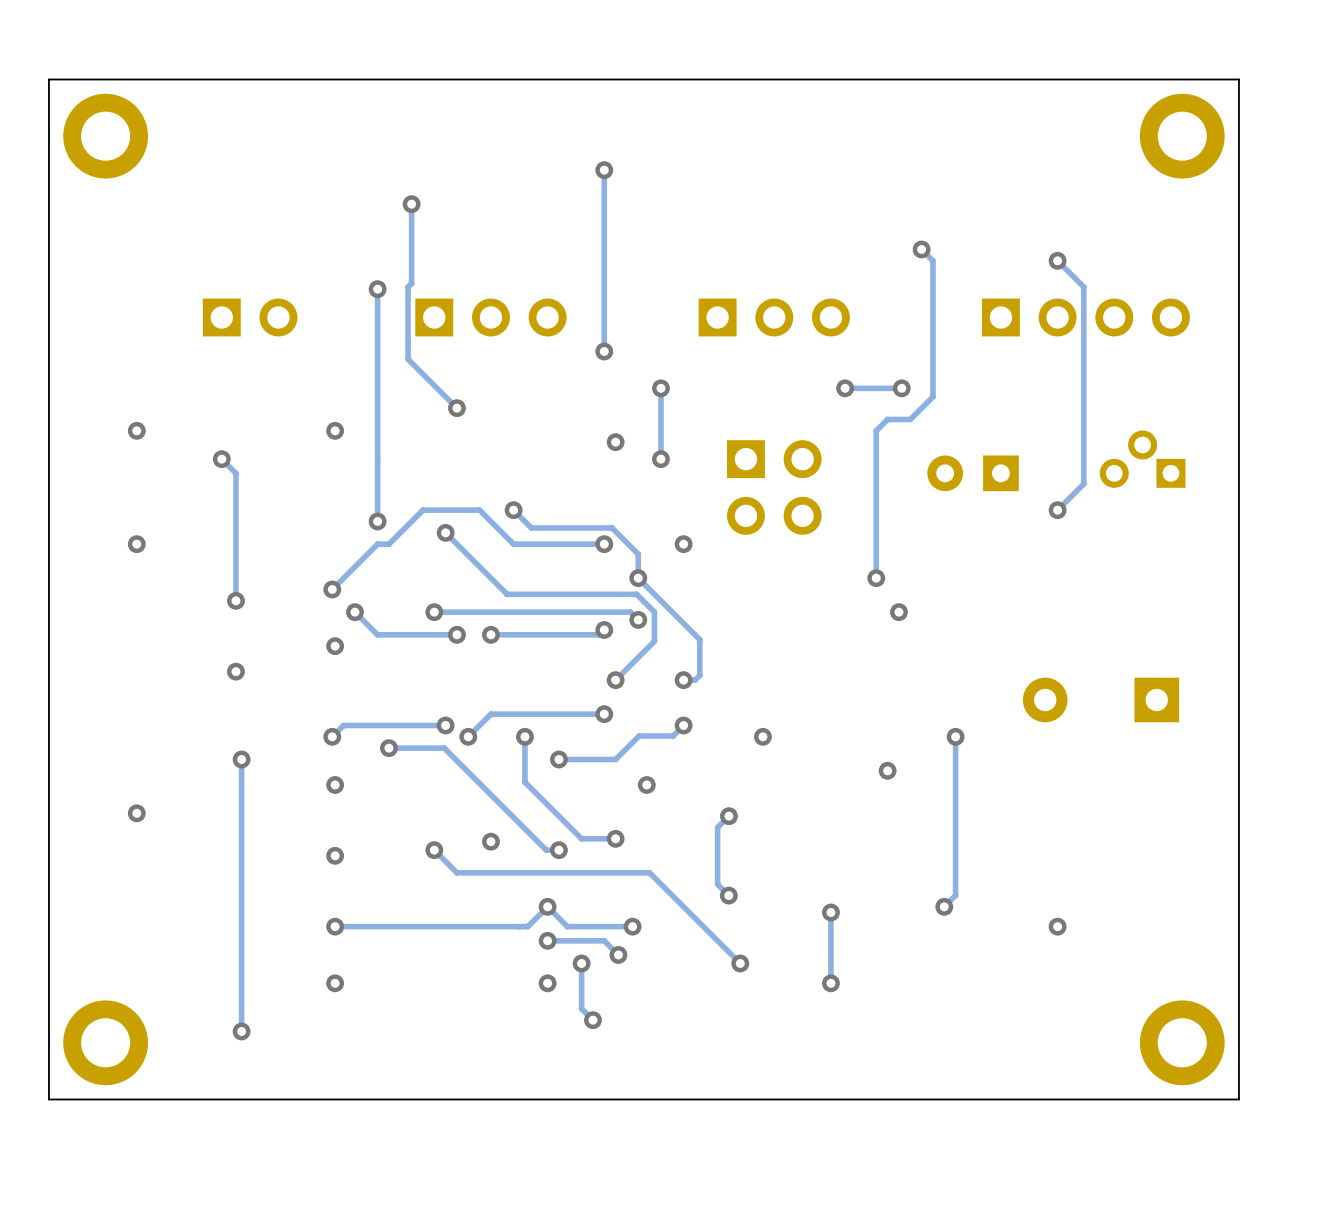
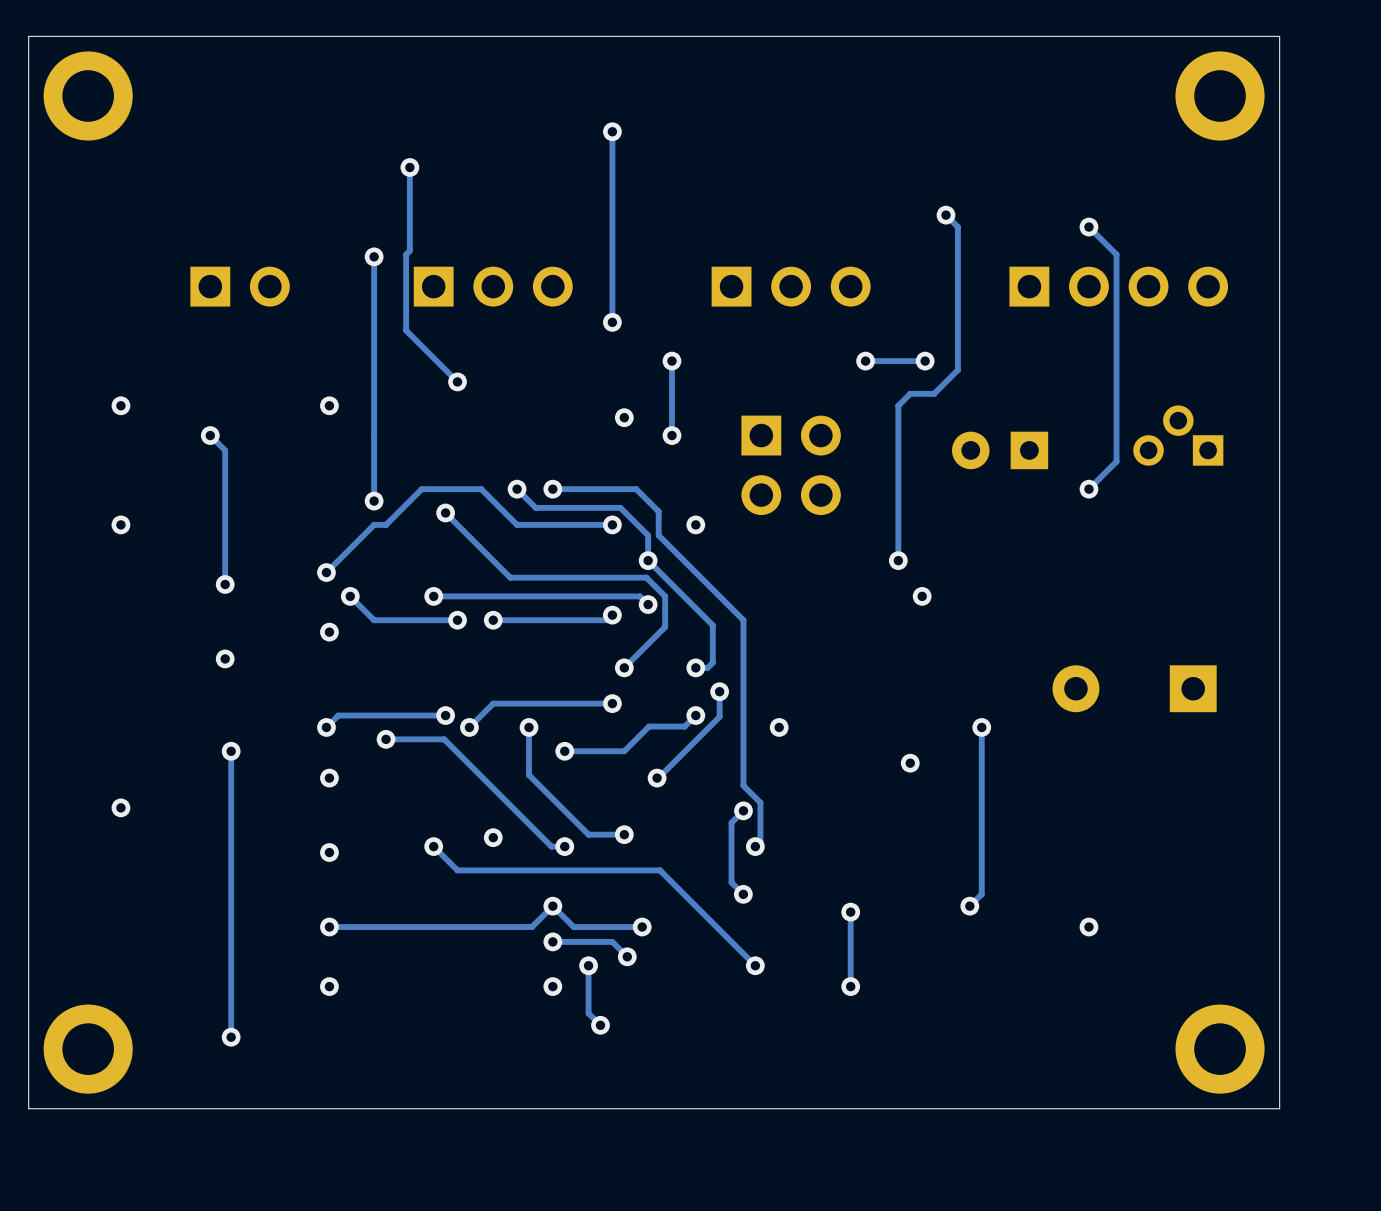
track: none -> (552, 489) (636, 489) (658, 511) (658, 535) (743, 620) (743, 785) (760, 802) (760, 841) (755, 846)
via: none -> (552, 489)
track: none -> (719, 691) (719, 716) (658, 778)
via: none -> (719, 691)
via: none -> (755, 846)

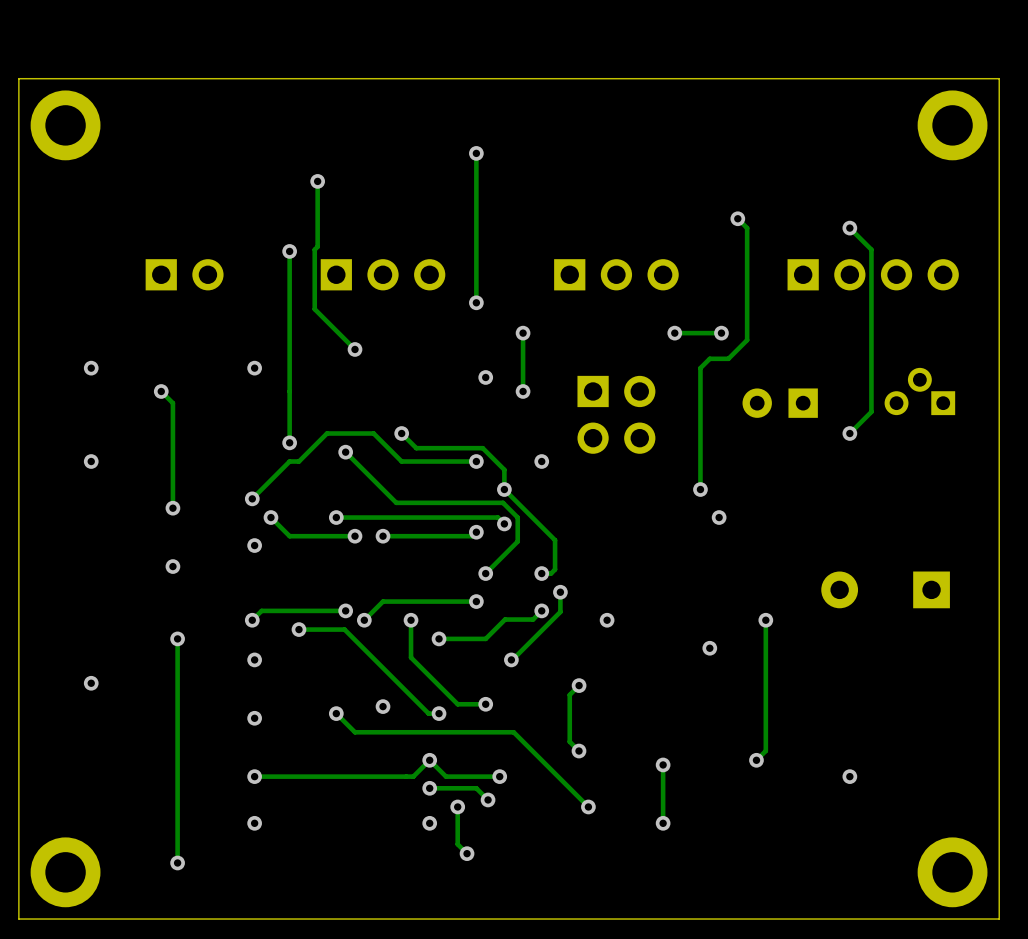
track: (552, 489) (636, 489) (658, 511) (658, 535) (743, 620) (743, 785) (760, 802) (760, 841) (755, 846) -> none
via: (552, 489) -> none
via: (755, 846) -> none

